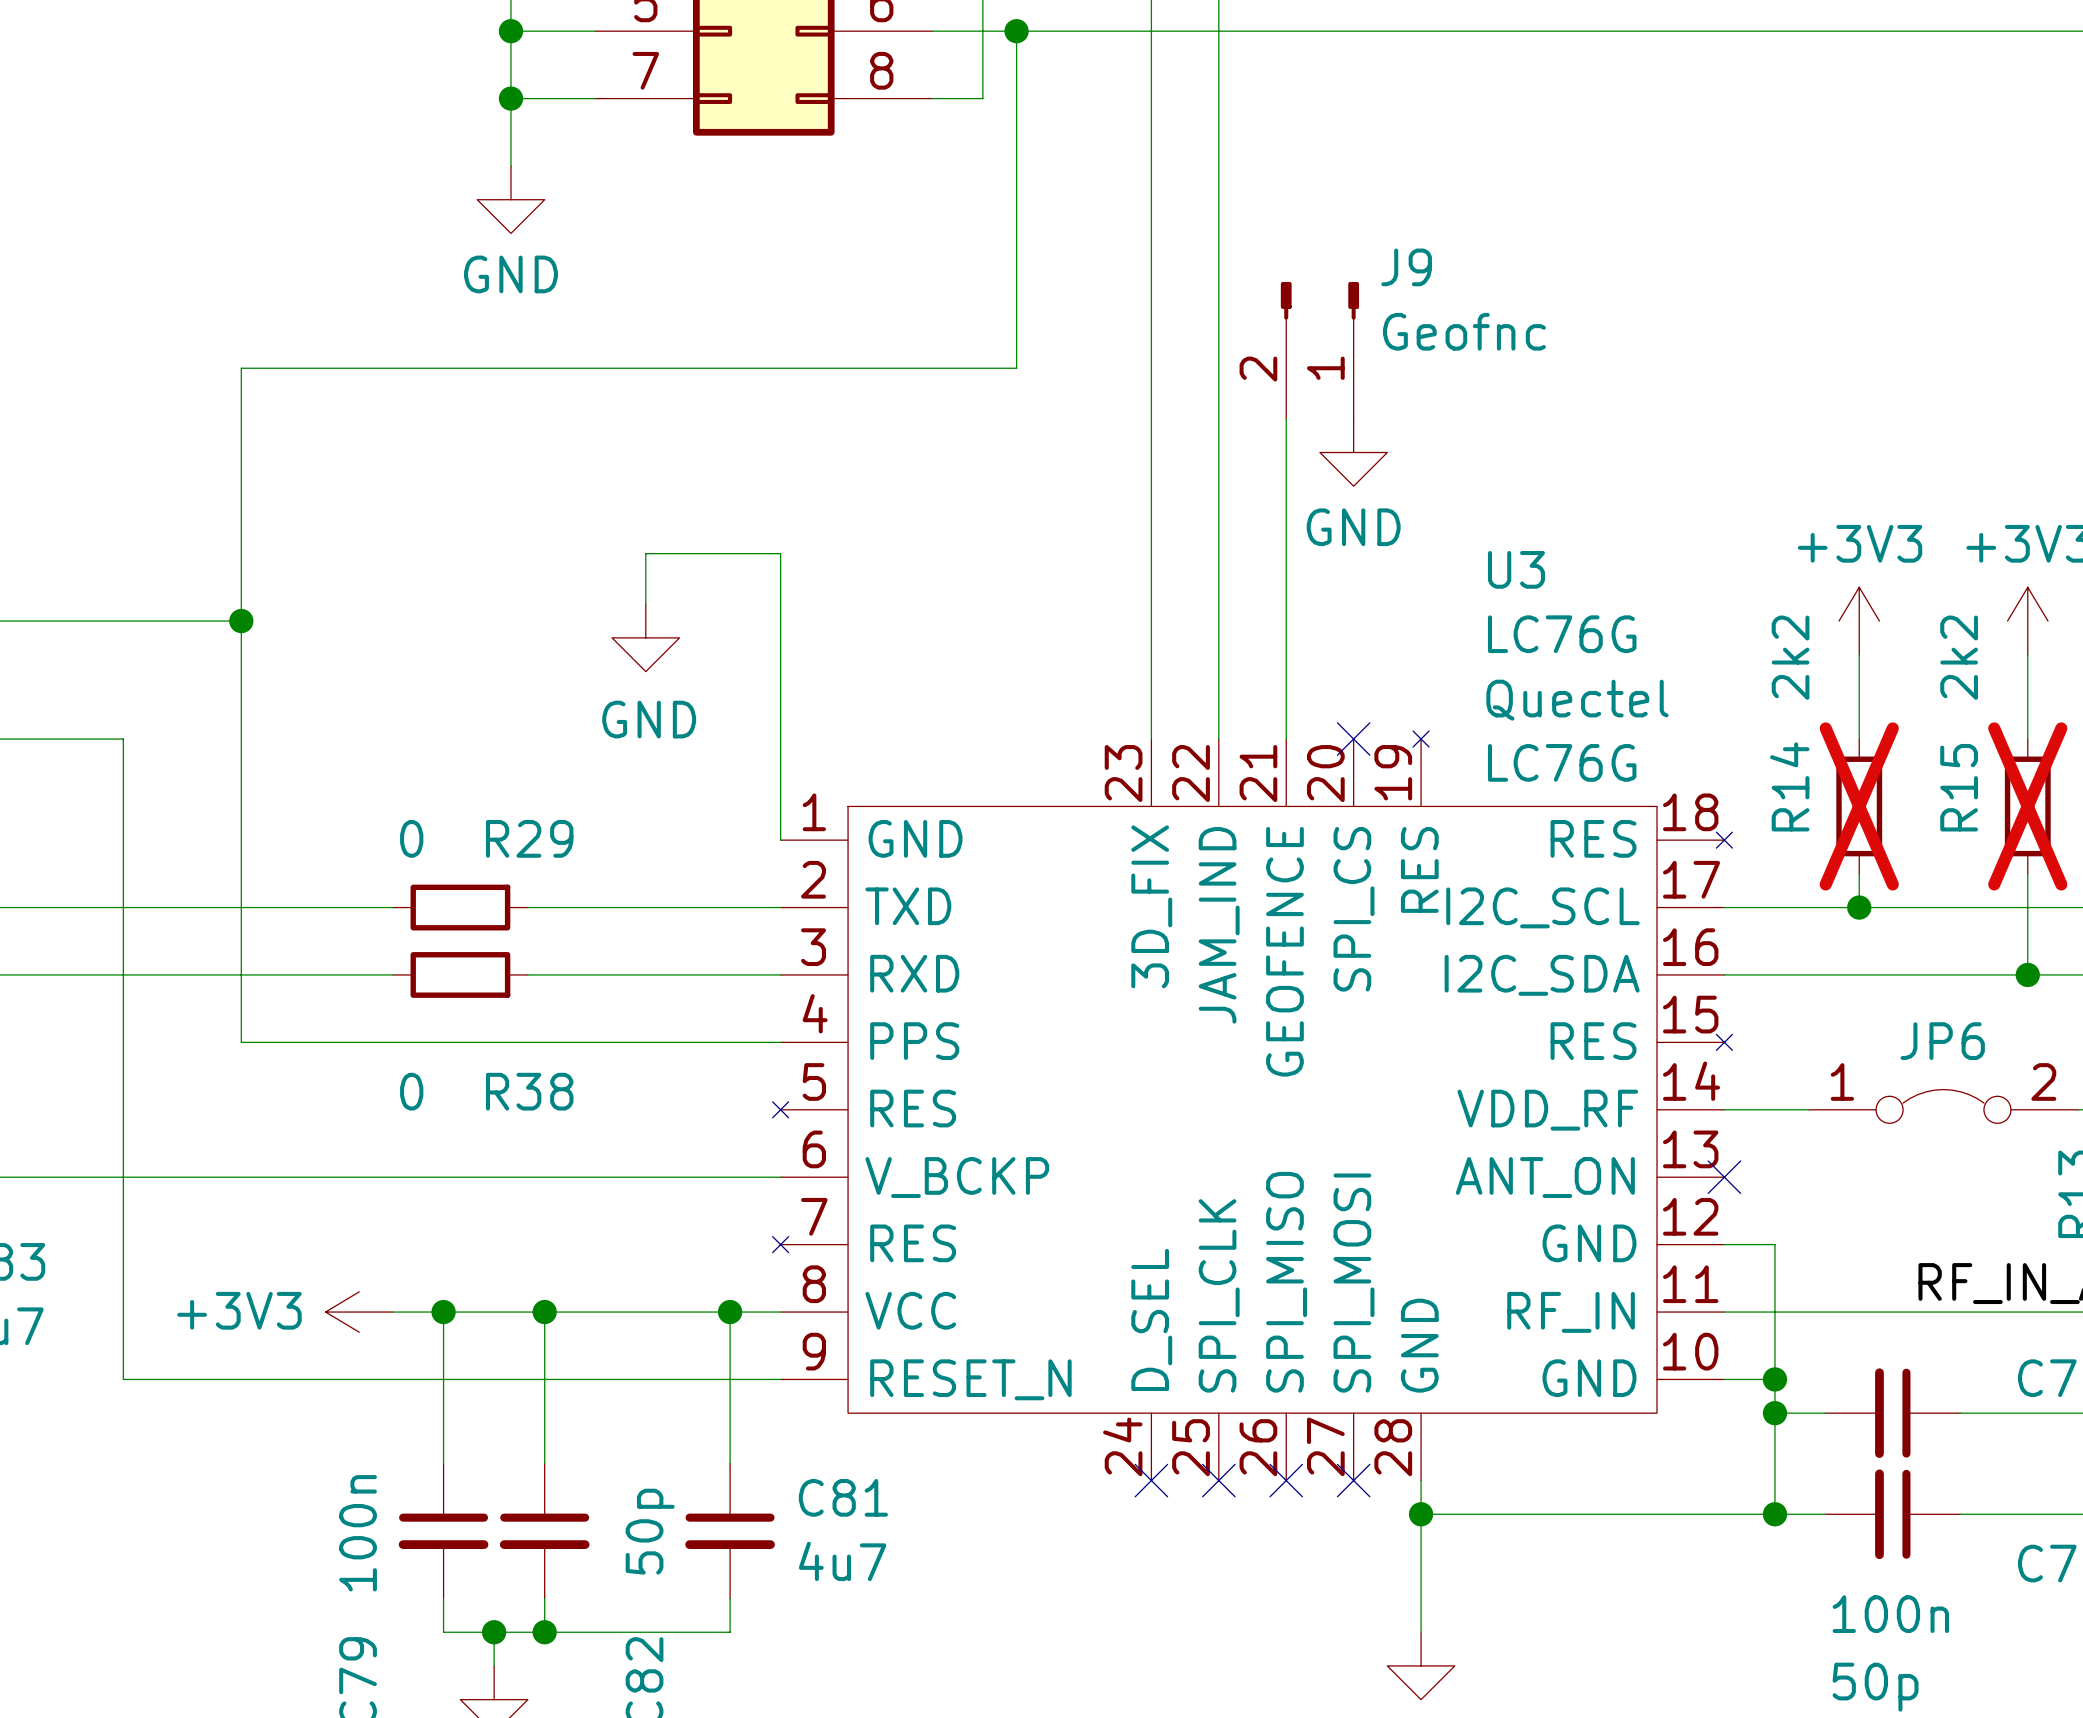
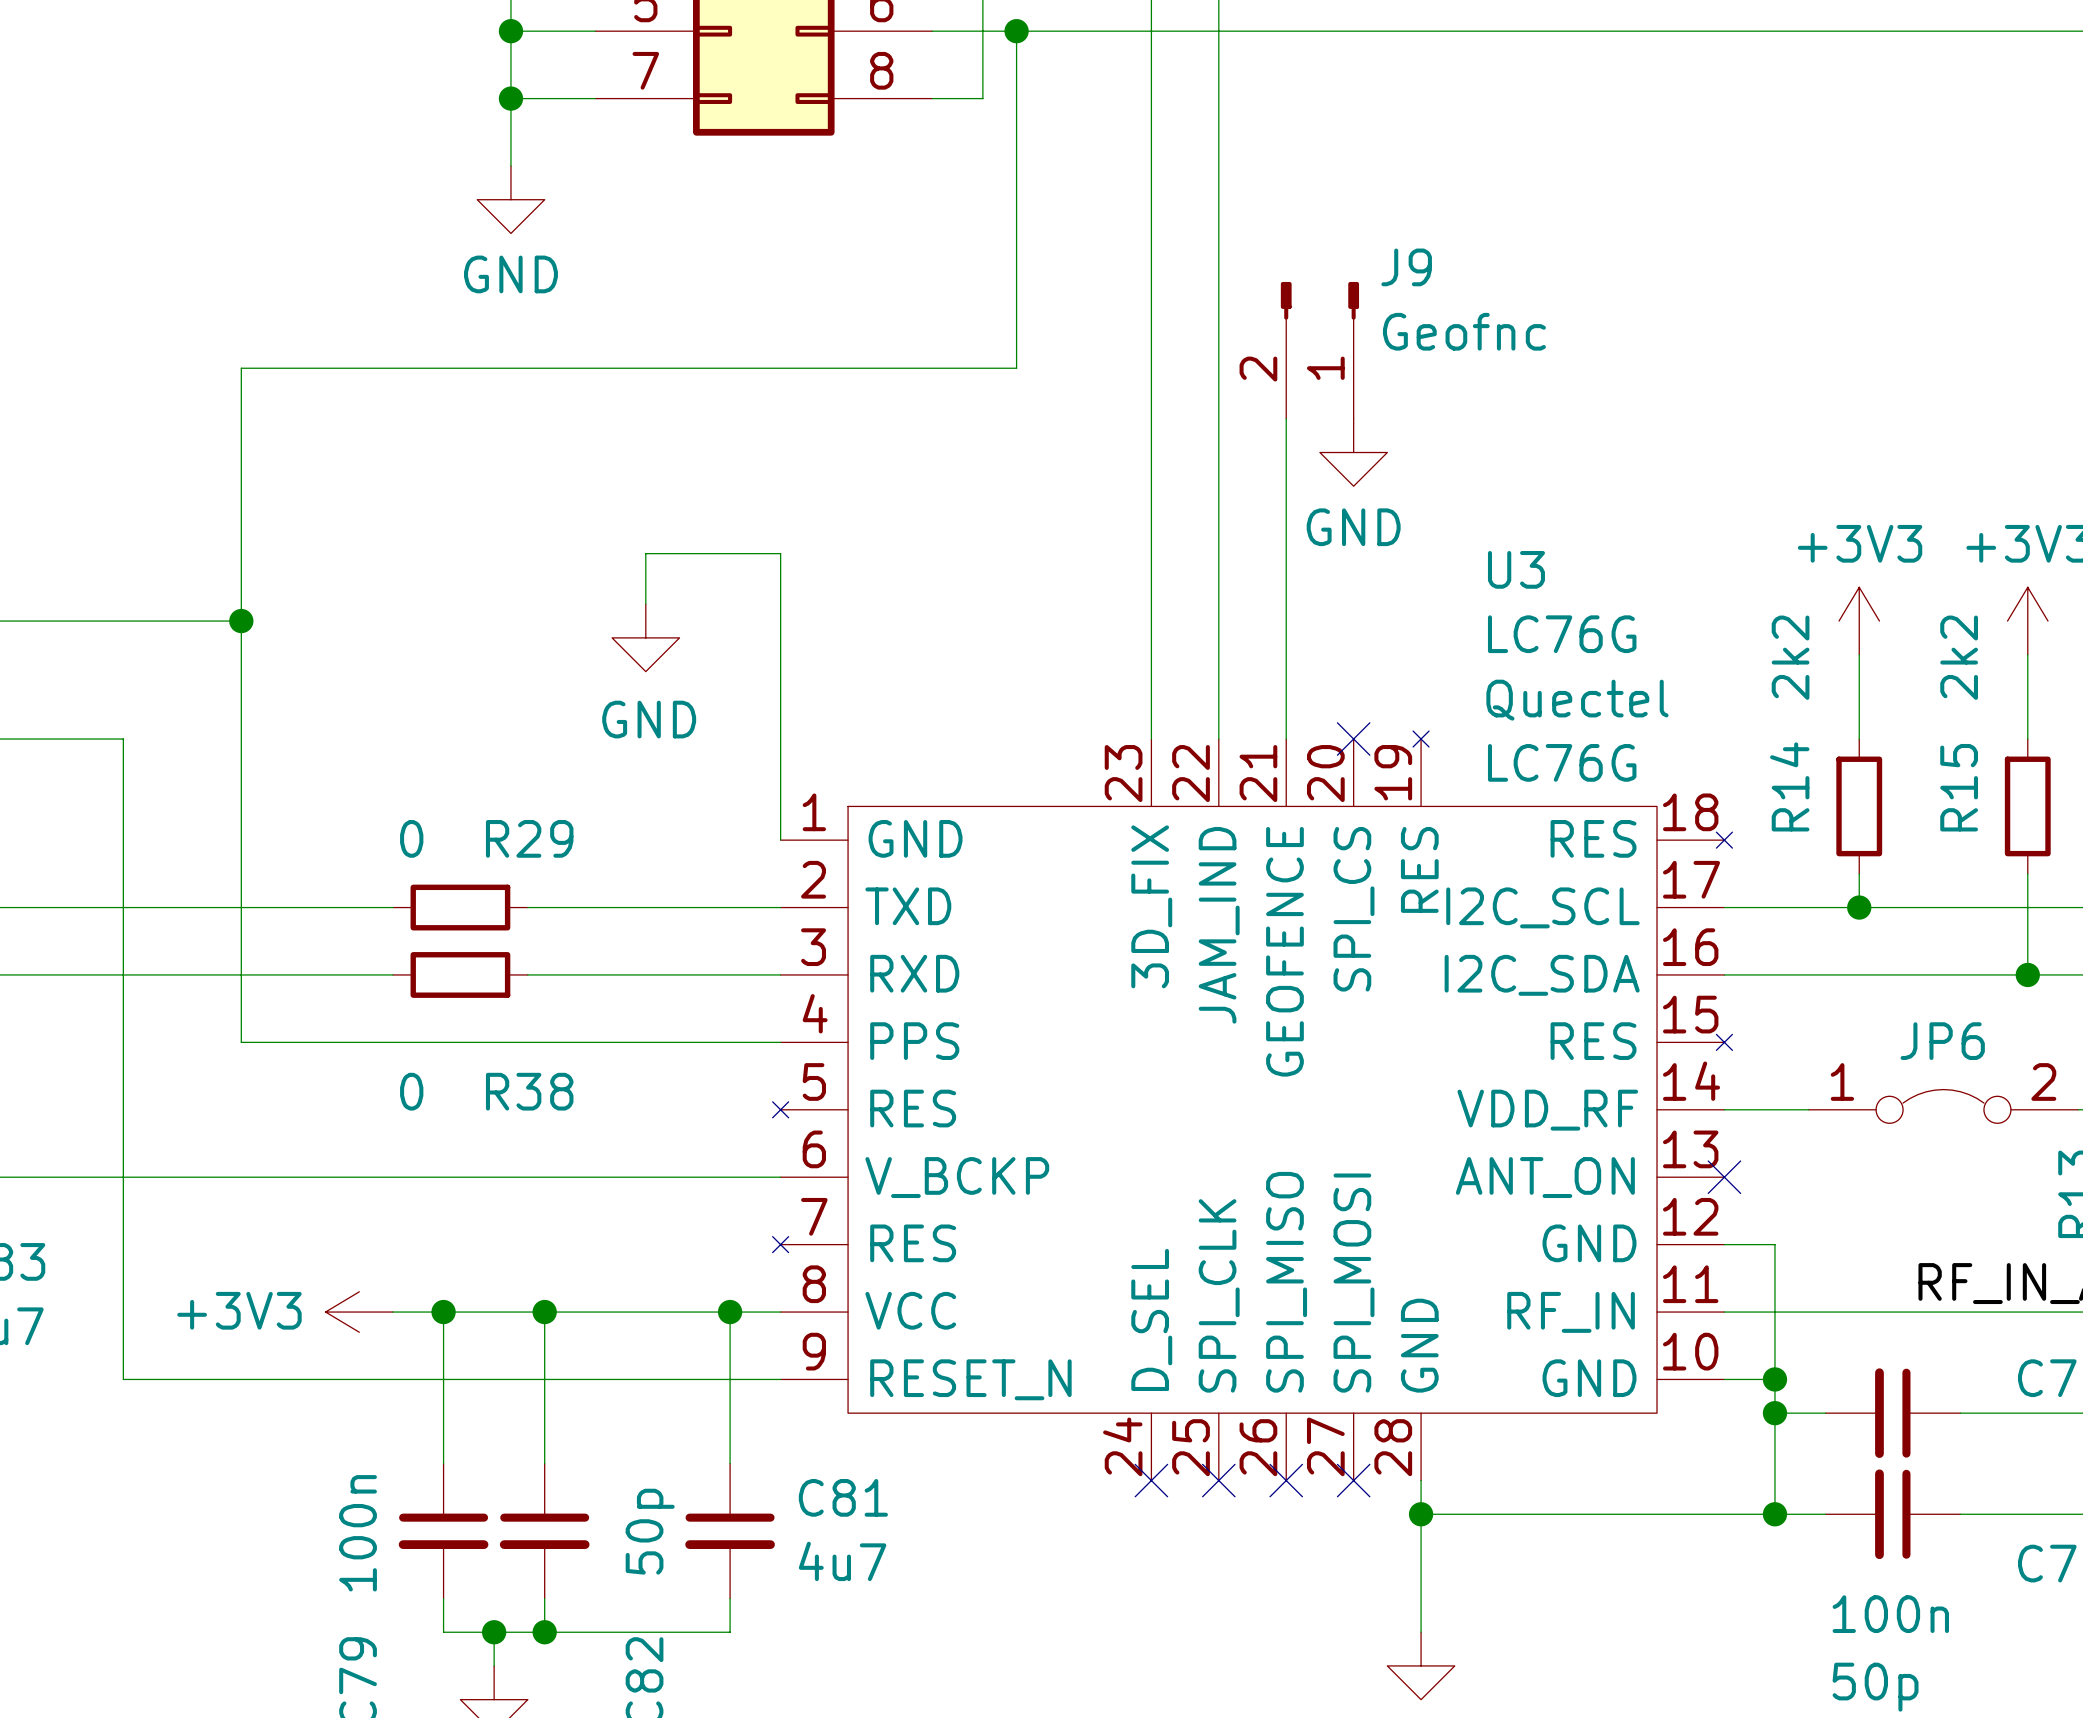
R14 do-not-place cross: (1859, 806) -> none
R15 do-not-place cross: (2027, 806) -> none

